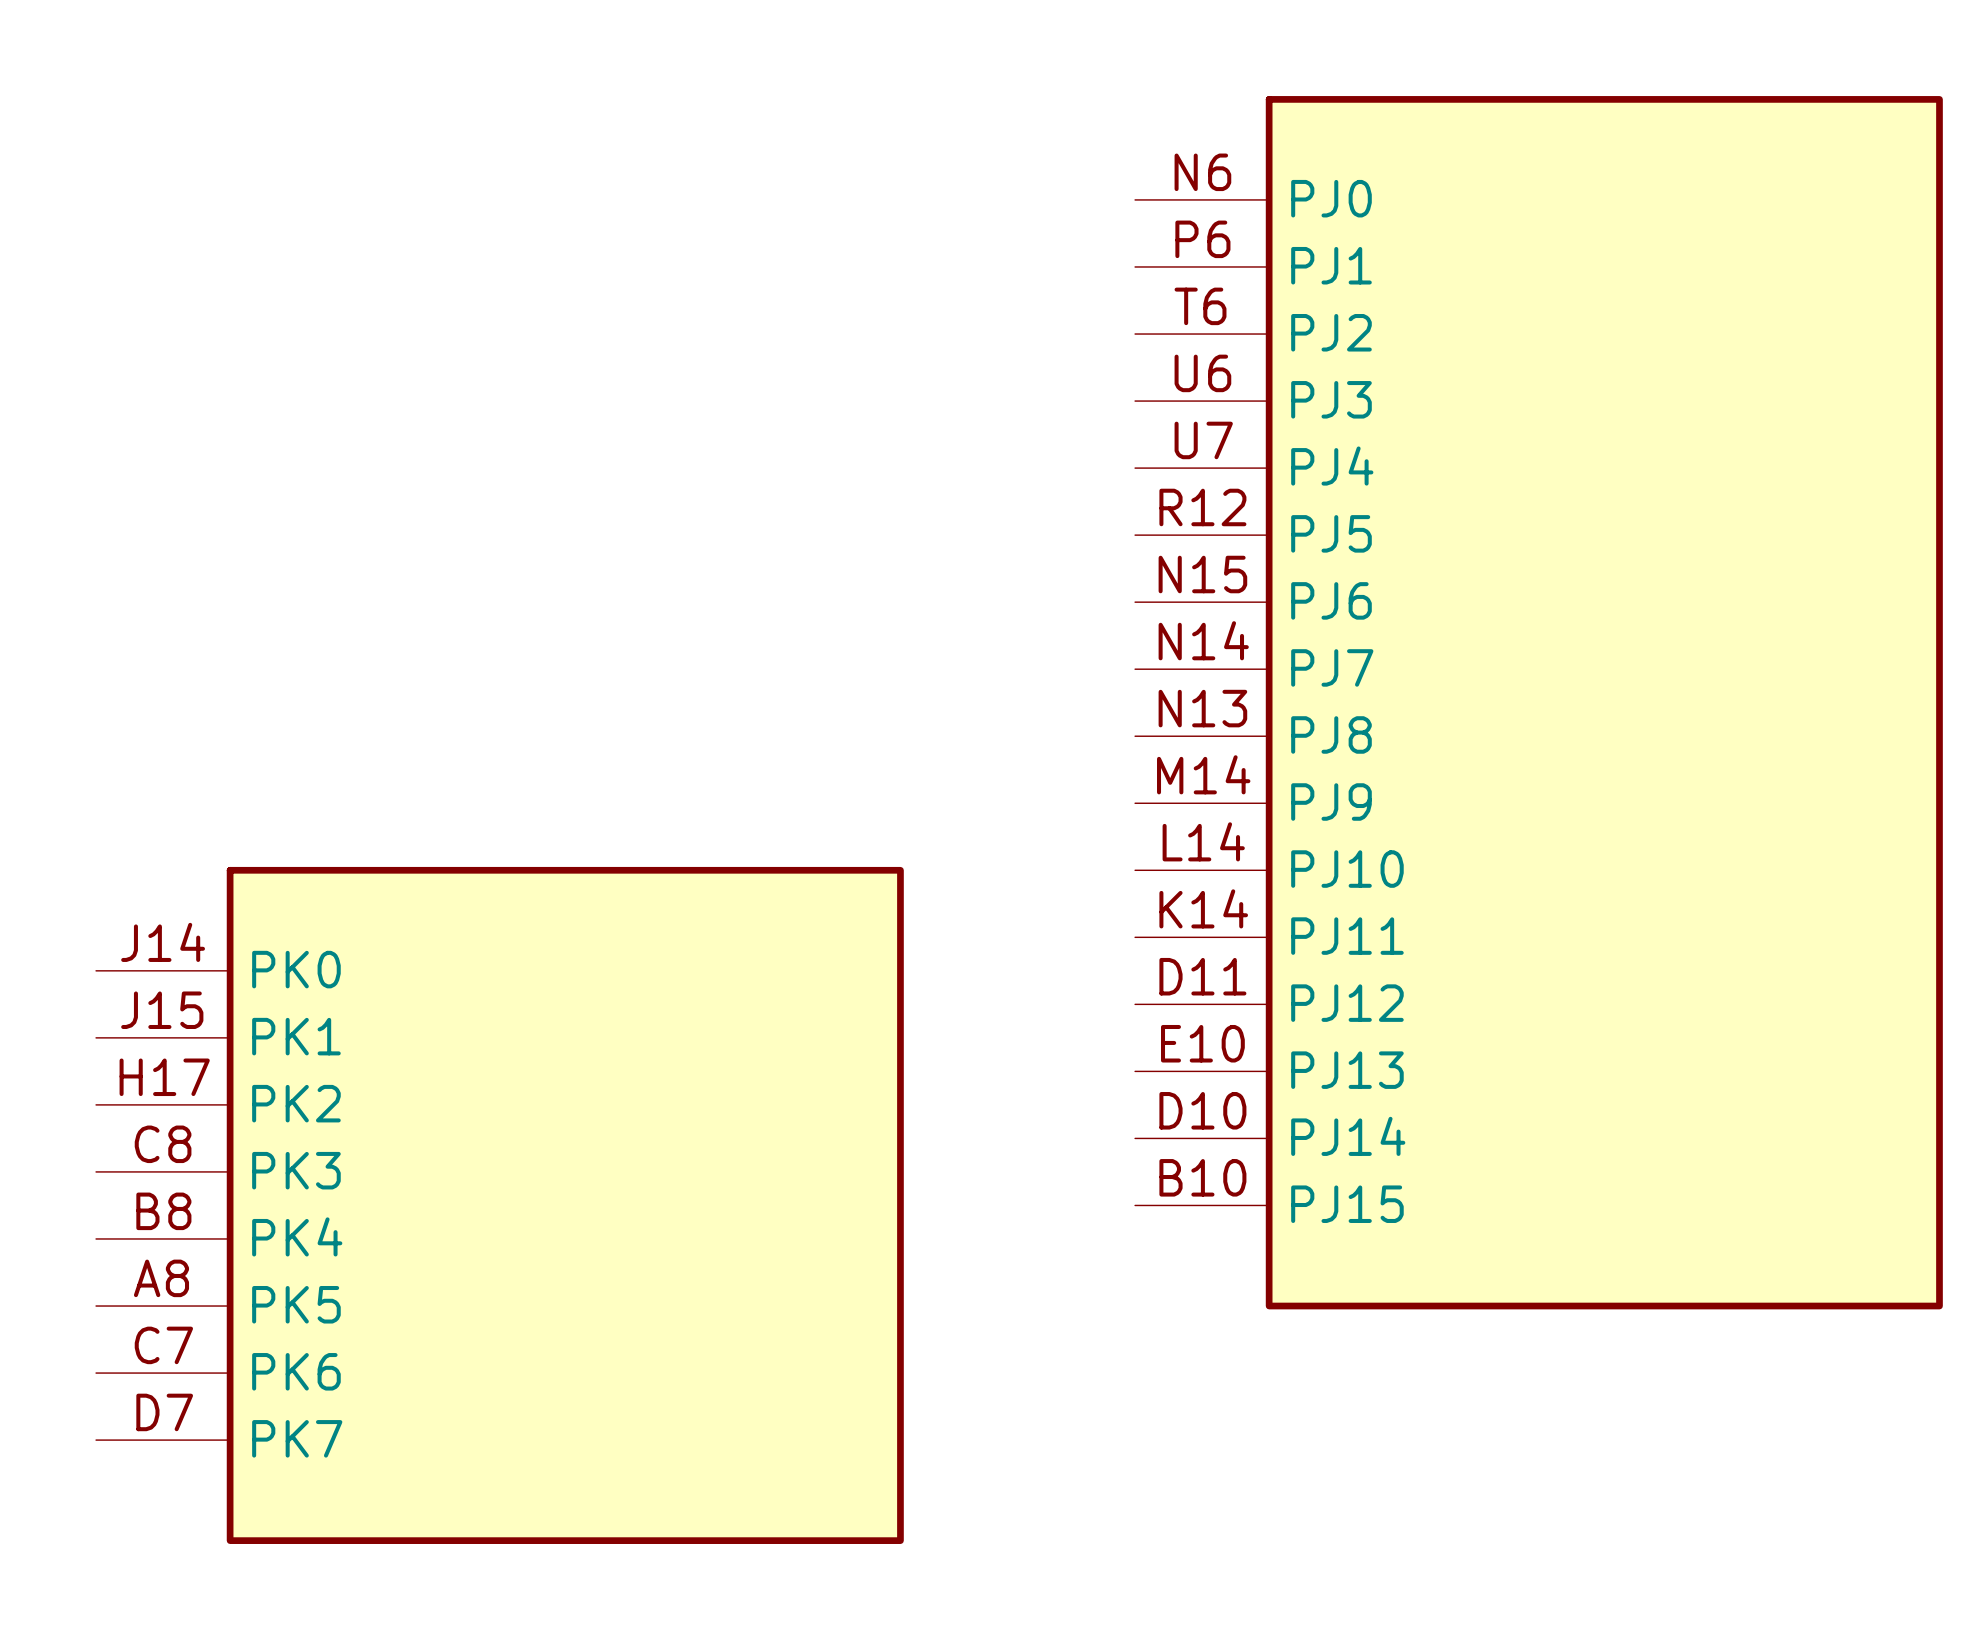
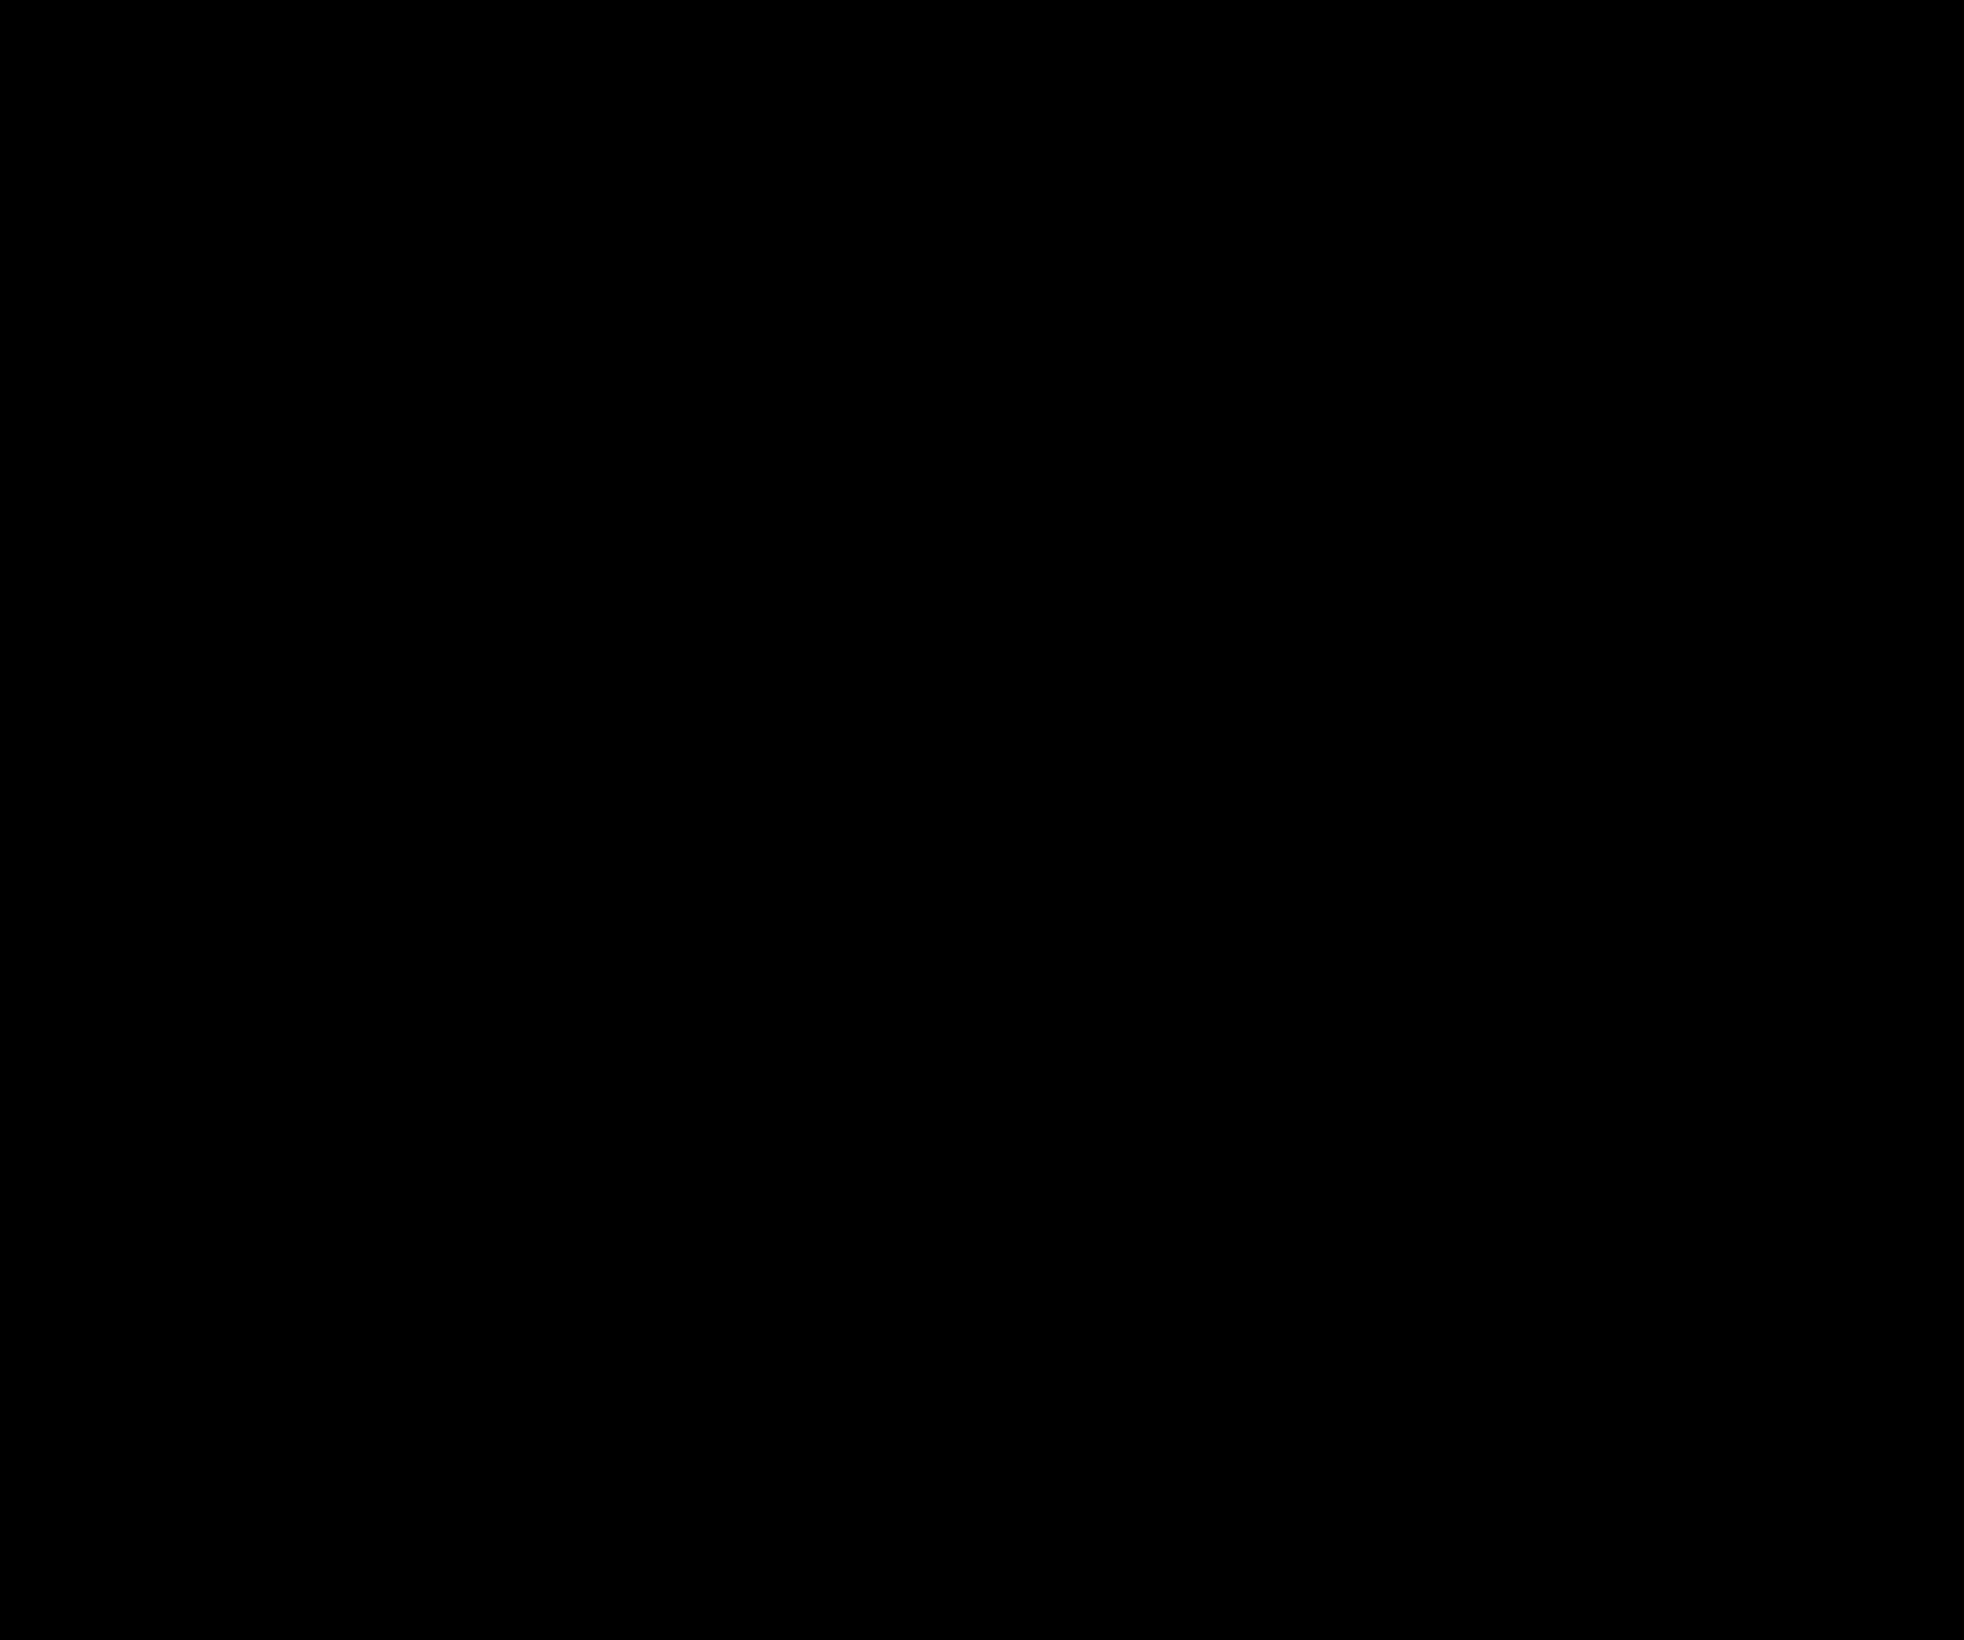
part: (1538, 702) -> none
part: (499, 1205) -> none

